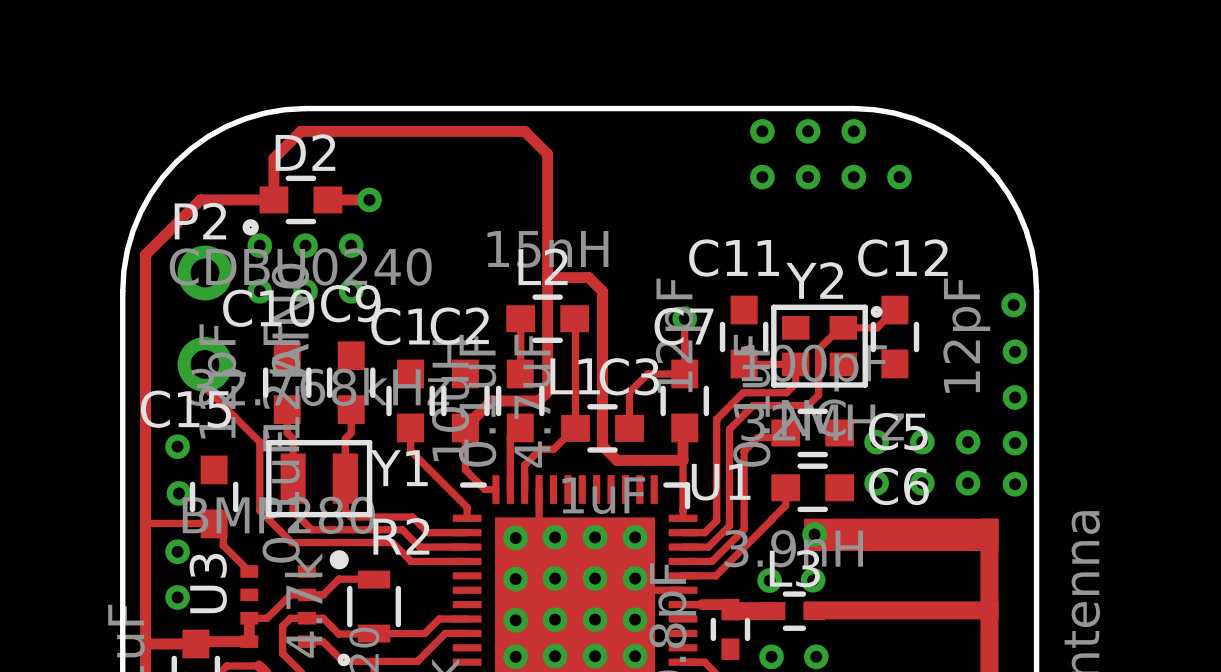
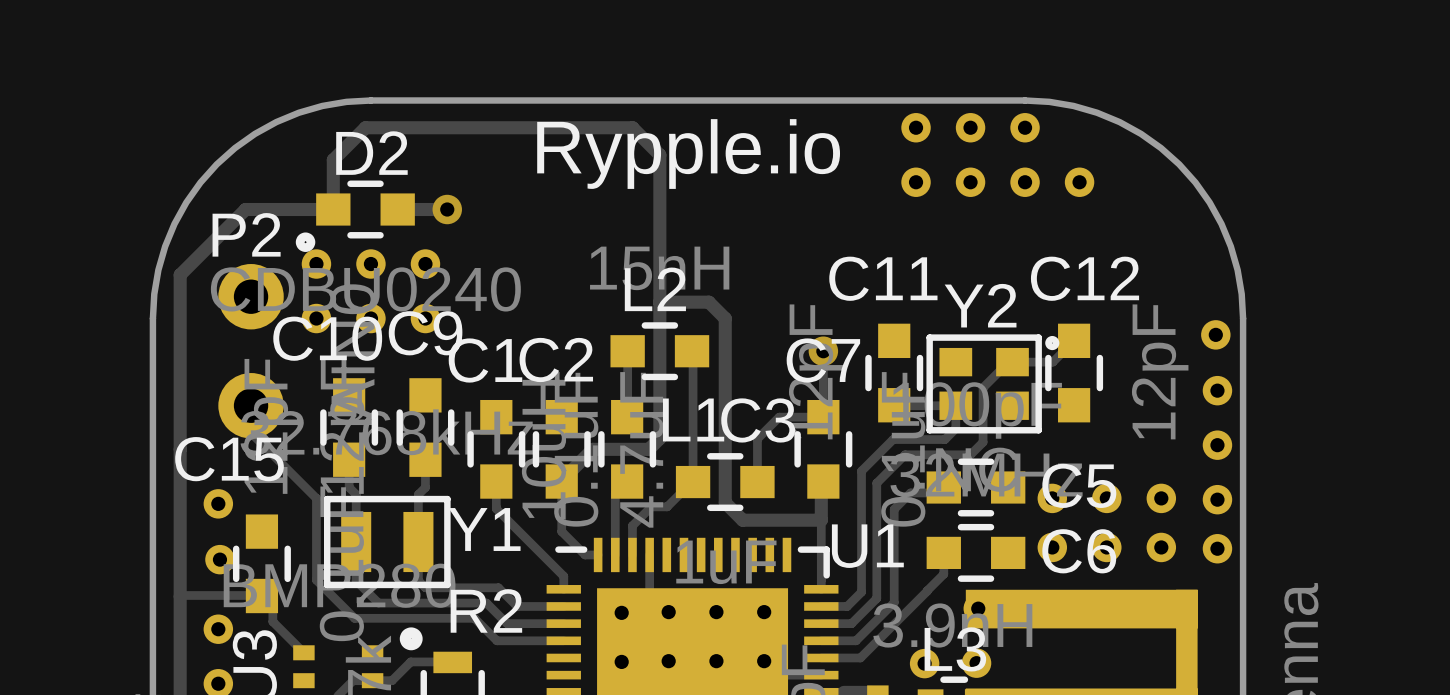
text: none -> Rypple.io (688, 154)

